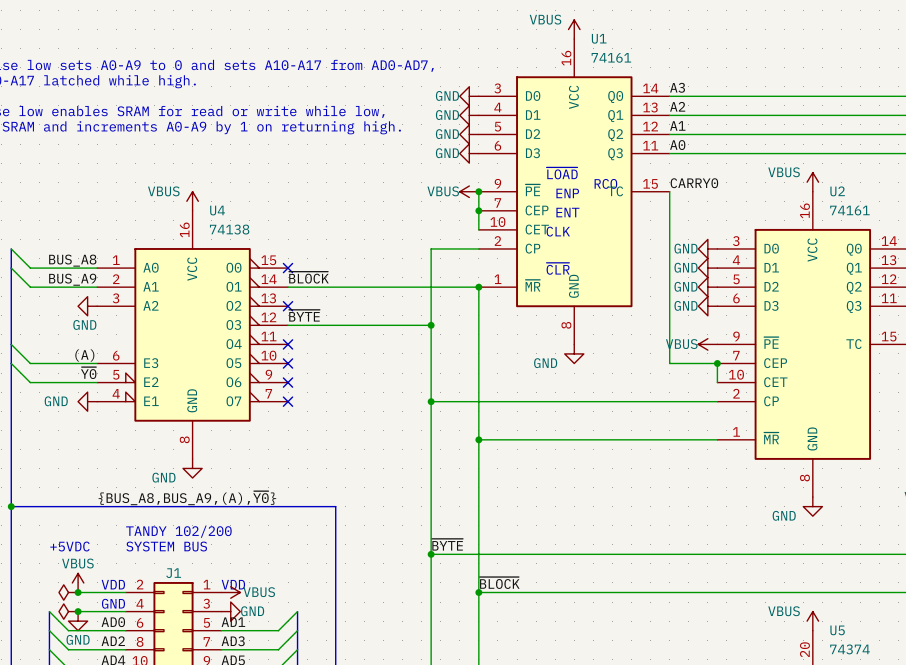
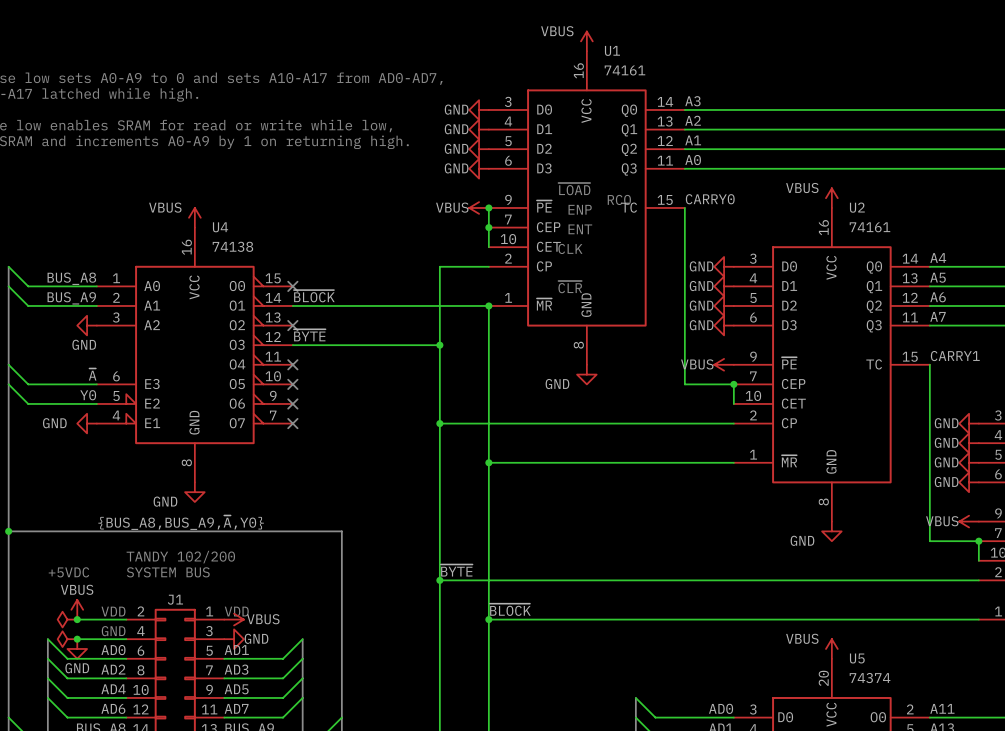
label: (A) (84, 355) -> ~{A} (92, 374)
label: ~{Y0} (88, 373) -> Y0 (88, 395)
label: {BUS_A8,BUS_A9,(A),~{Y0}} (187, 498) -> {BUS_A8,BUS_A9,~{A},Y0} (181, 522)

